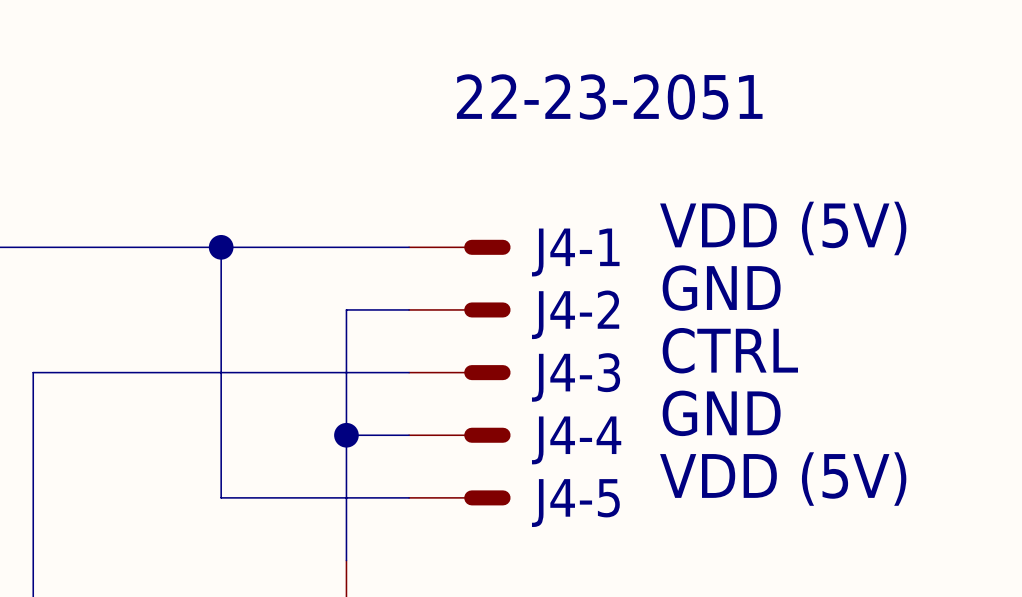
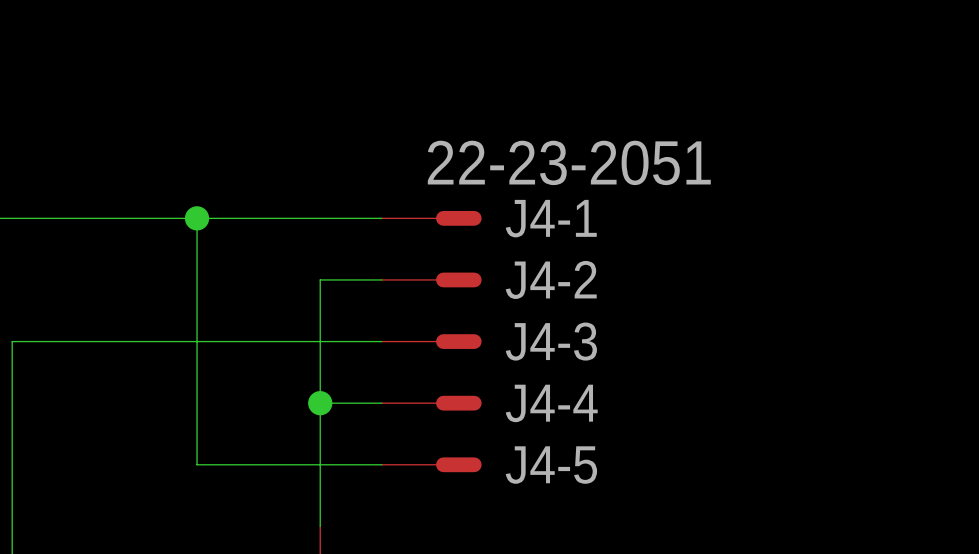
J4-1 value position: 22-23-2051 (609, 97) -> 22-23-2051 (569, 162)
text: VDD (5V) (783, 228) -> none
text: GND (721, 288) -> none
text: CTRL (730, 350) -> none
text: GND (721, 413) -> none
text: VDD (5V) (783, 479) -> none

